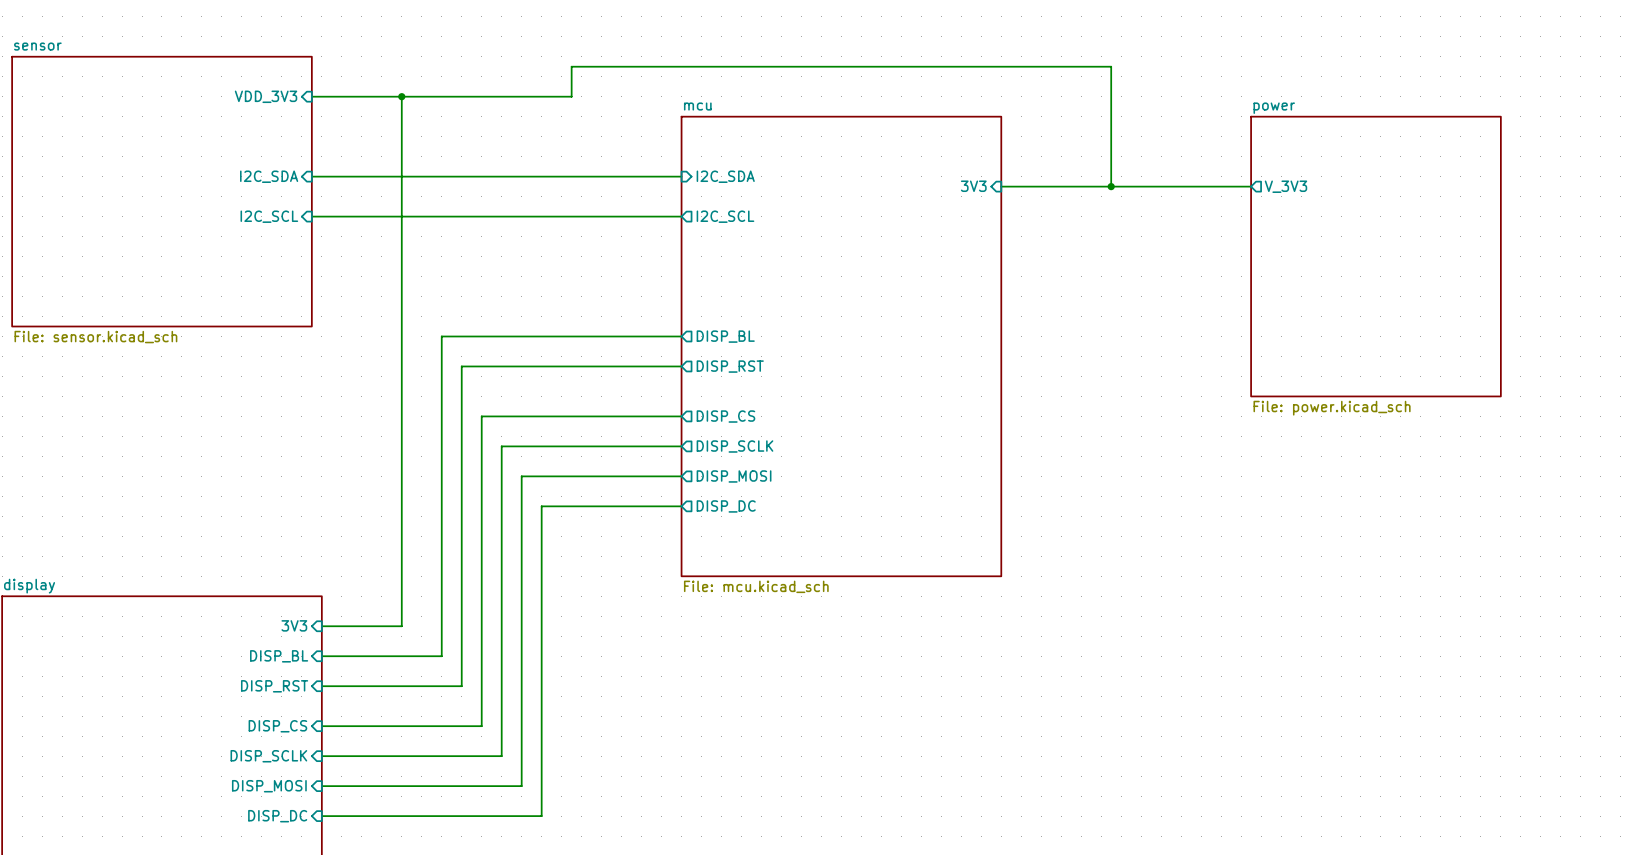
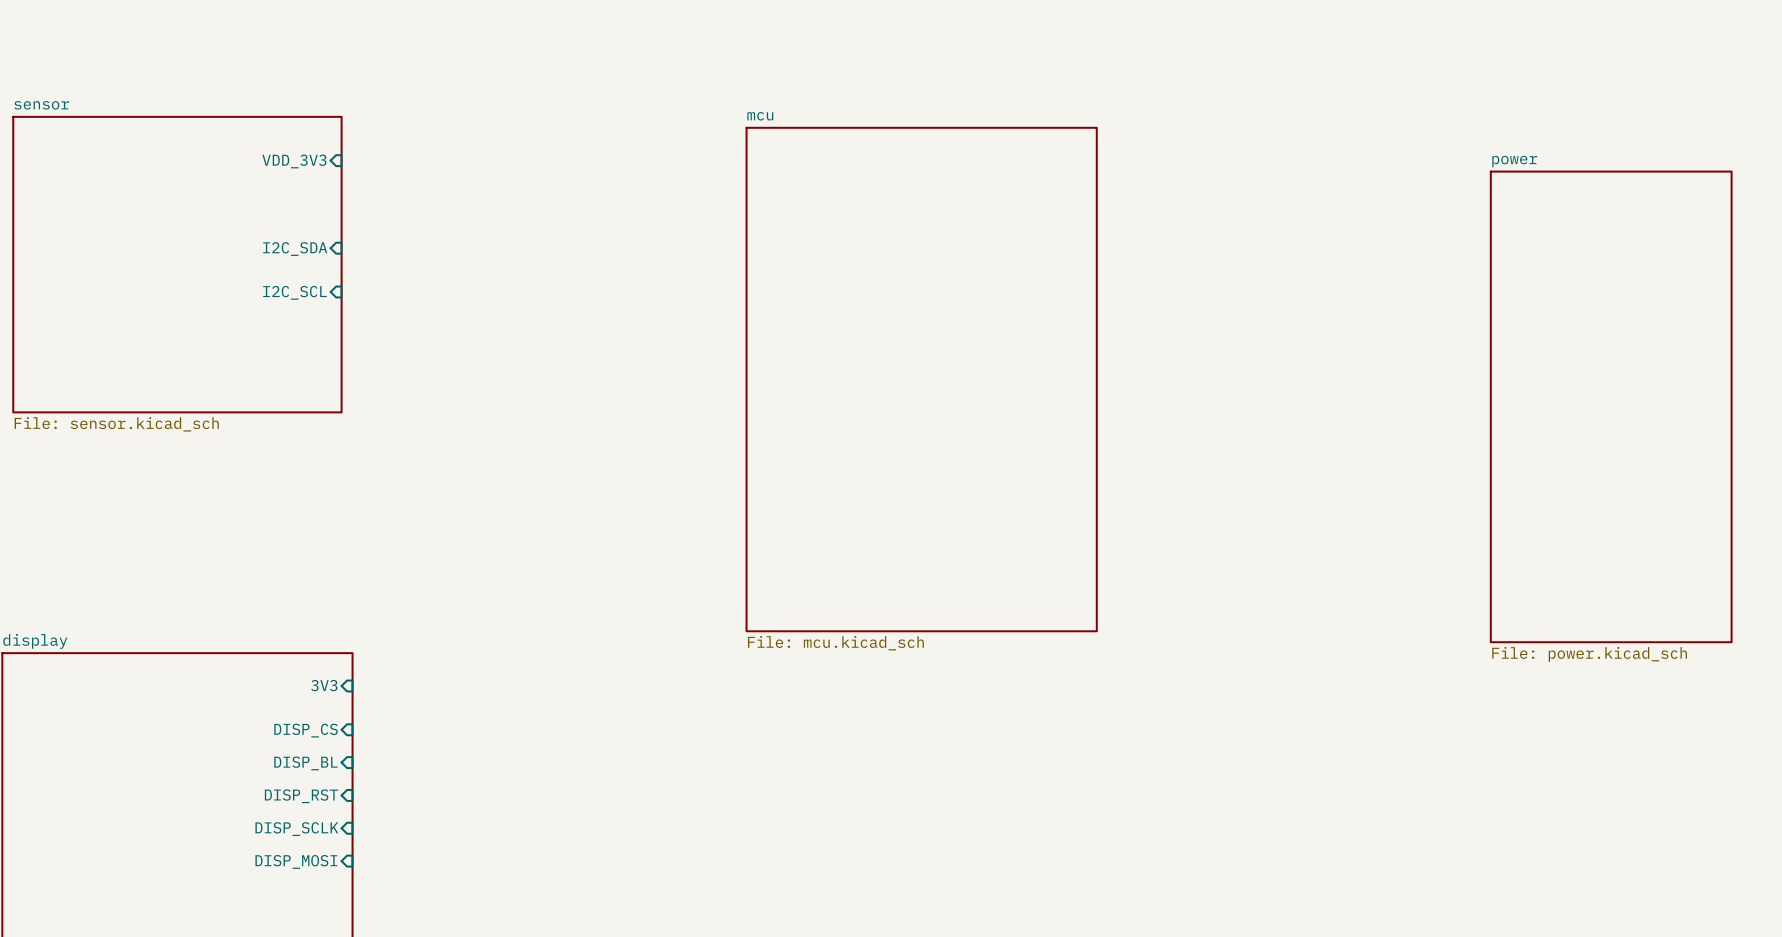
sheet pin position: VDD_3V3 (266, 96) -> VDD_3V3 (294, 161)
wire: (311, 96) (571, 96) (571, 66) (1111, 66) (1111, 186) -> none
wire: (401, 96) (401, 626) (321, 626) -> none
junction: (401, 96) -> none
sheet pin position: I2C_SDA (269, 176) -> I2C_SDA (295, 249)
wire: (311, 176) (681, 176) -> none
sheet pin: I2C_SDA (725, 176) -> none
sheet pin: 3V3 (973, 186) -> none
wire: (1001, 186) (1251, 186) -> none
junction: (1111, 186) -> none
sheet pin: V_3V3 (1285, 186) -> none
sheet sensor position: (161, 191) -> (177, 264)
sheet pin position: I2C_SCL (269, 216) -> I2C_SCL (294, 292)
wire: (311, 216) (681, 216) -> none
sheet pin: I2C_SCL (725, 216) -> none
sheet power: File: power.kicad_sch (1375, 256) -> none
wire: (681, 336) (441, 336) (441, 656) (321, 656) -> none
sheet pin: DISP_BL (725, 336) -> none
wire: (681, 366) (461, 366) (461, 686) (321, 686) -> none
sheet pin: DISP_RST (730, 366) -> none
sheet power: none -> File: power.kicad_sch (1611, 406)
wire: (681, 416) (481, 416) (481, 726) (321, 726) -> none
sheet pin: DISP_CS (725, 416) -> none
wire: (681, 446) (501, 446) (501, 756) (321, 756) -> none
sheet pin: DISP_SCLK (735, 446) -> none
wire: (681, 476) (521, 476) (521, 786) (321, 786) -> none
sheet pin: DISP_MOSI (734, 476) -> none
wire: (681, 506) (541, 506) (541, 816) (321, 816) -> none
sheet pin: DISP_DC (726, 506) -> none
sheet pin position: DISP_BL (279, 656) -> DISP_BL (305, 763)
sheet pin: DISP_RST (274, 686) -> DISP_CS (306, 730)
sheet pin: DISP_CS (277, 726) -> DISP_RST (301, 796)
sheet pin: DISP_DC (277, 816) -> none

